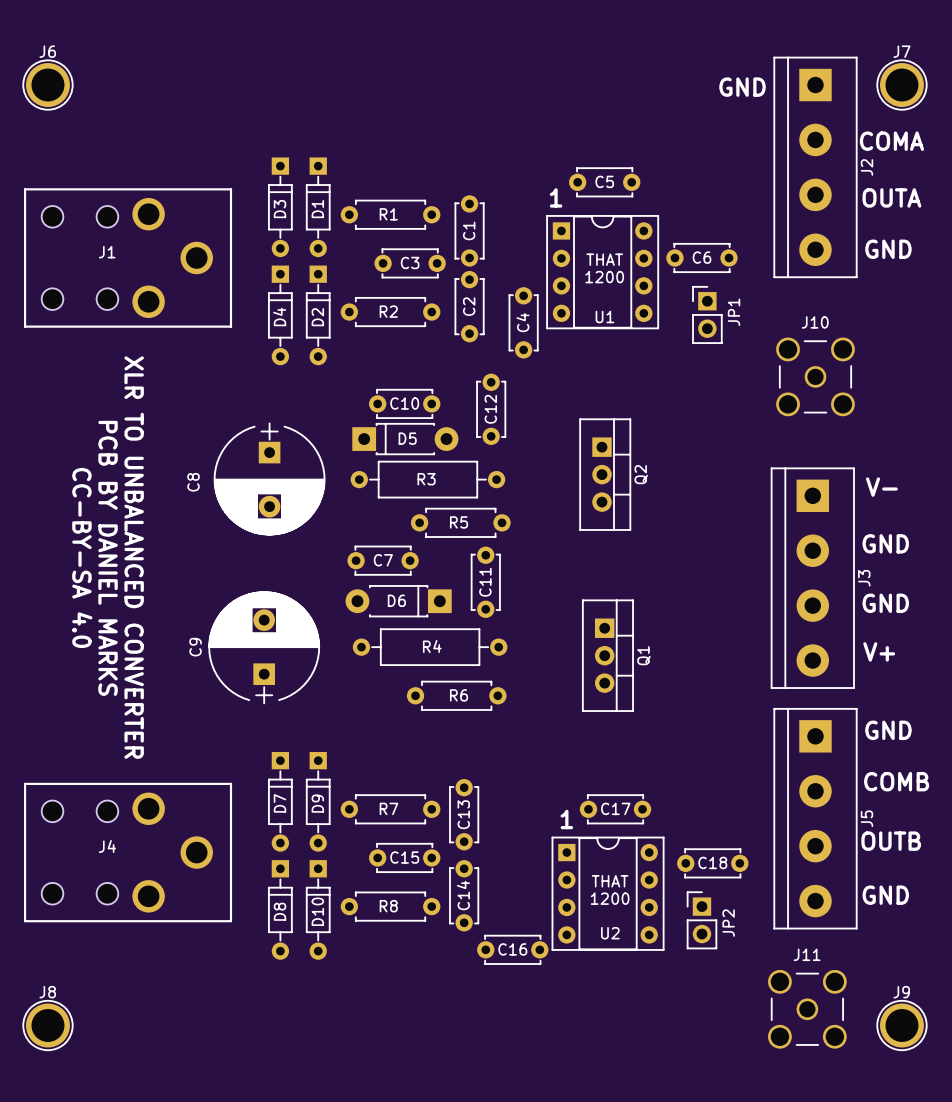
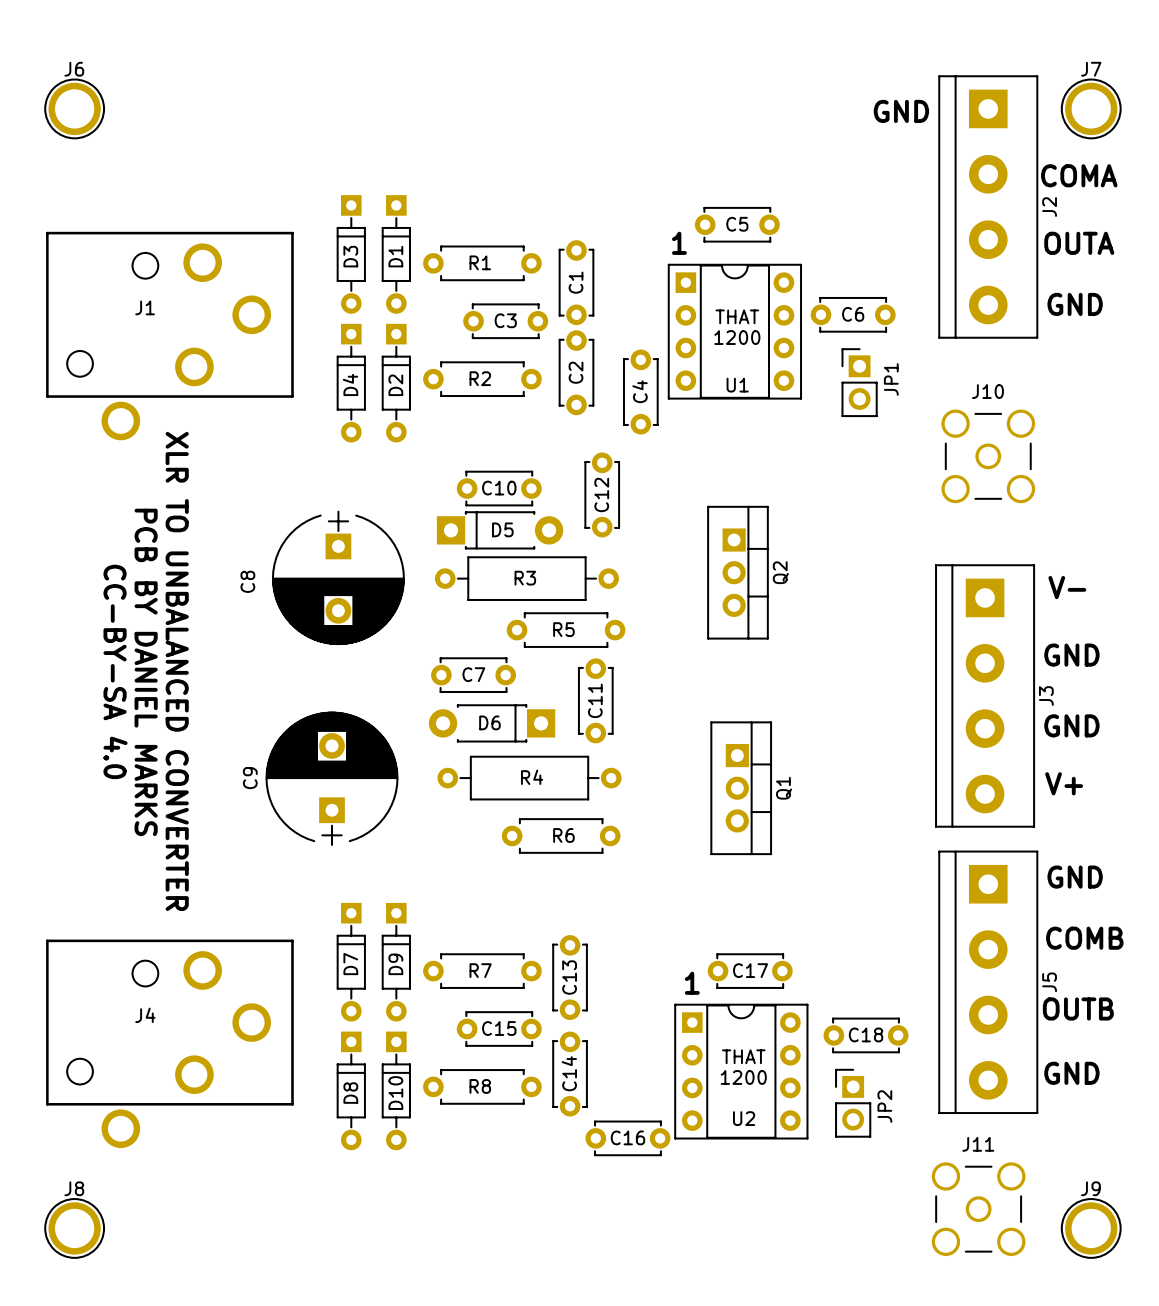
J1 footprint: [23, 188, 233, 328] -> [46, 231, 294, 441]
J4 footprint: [23, 782, 233, 923] -> [46, 939, 294, 1149]

